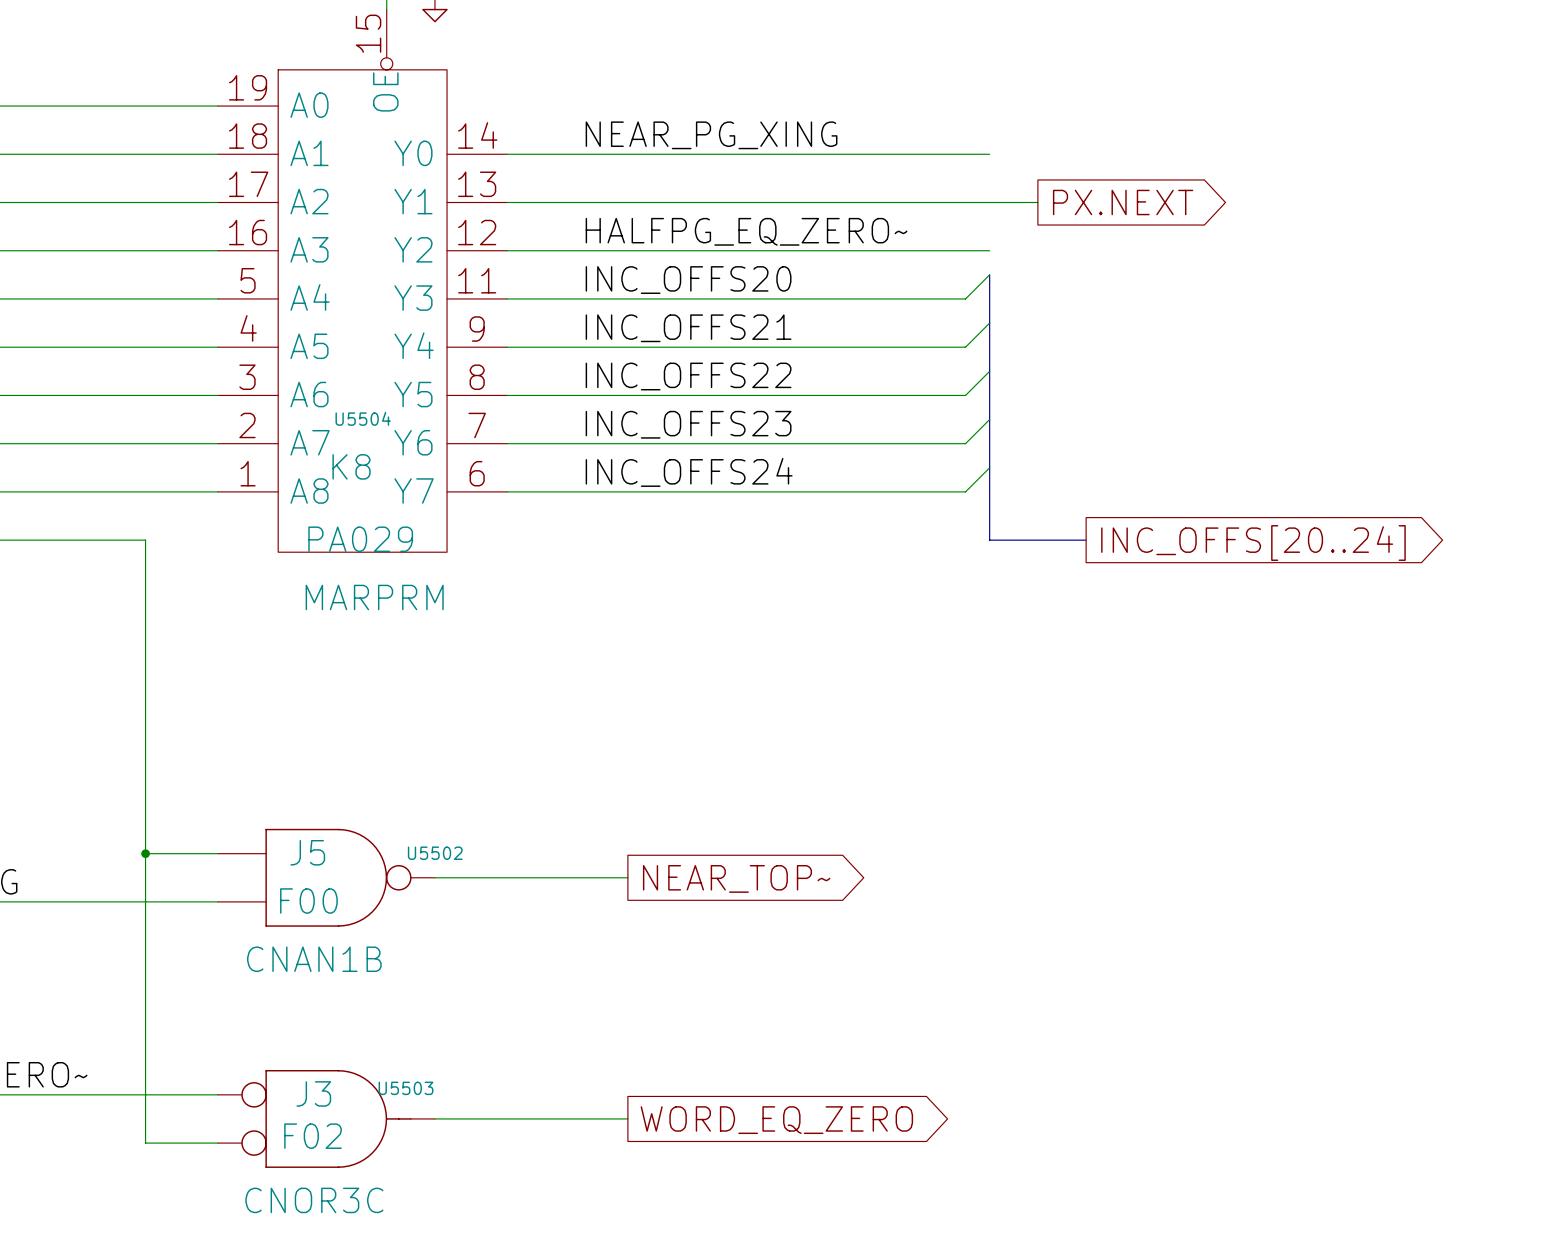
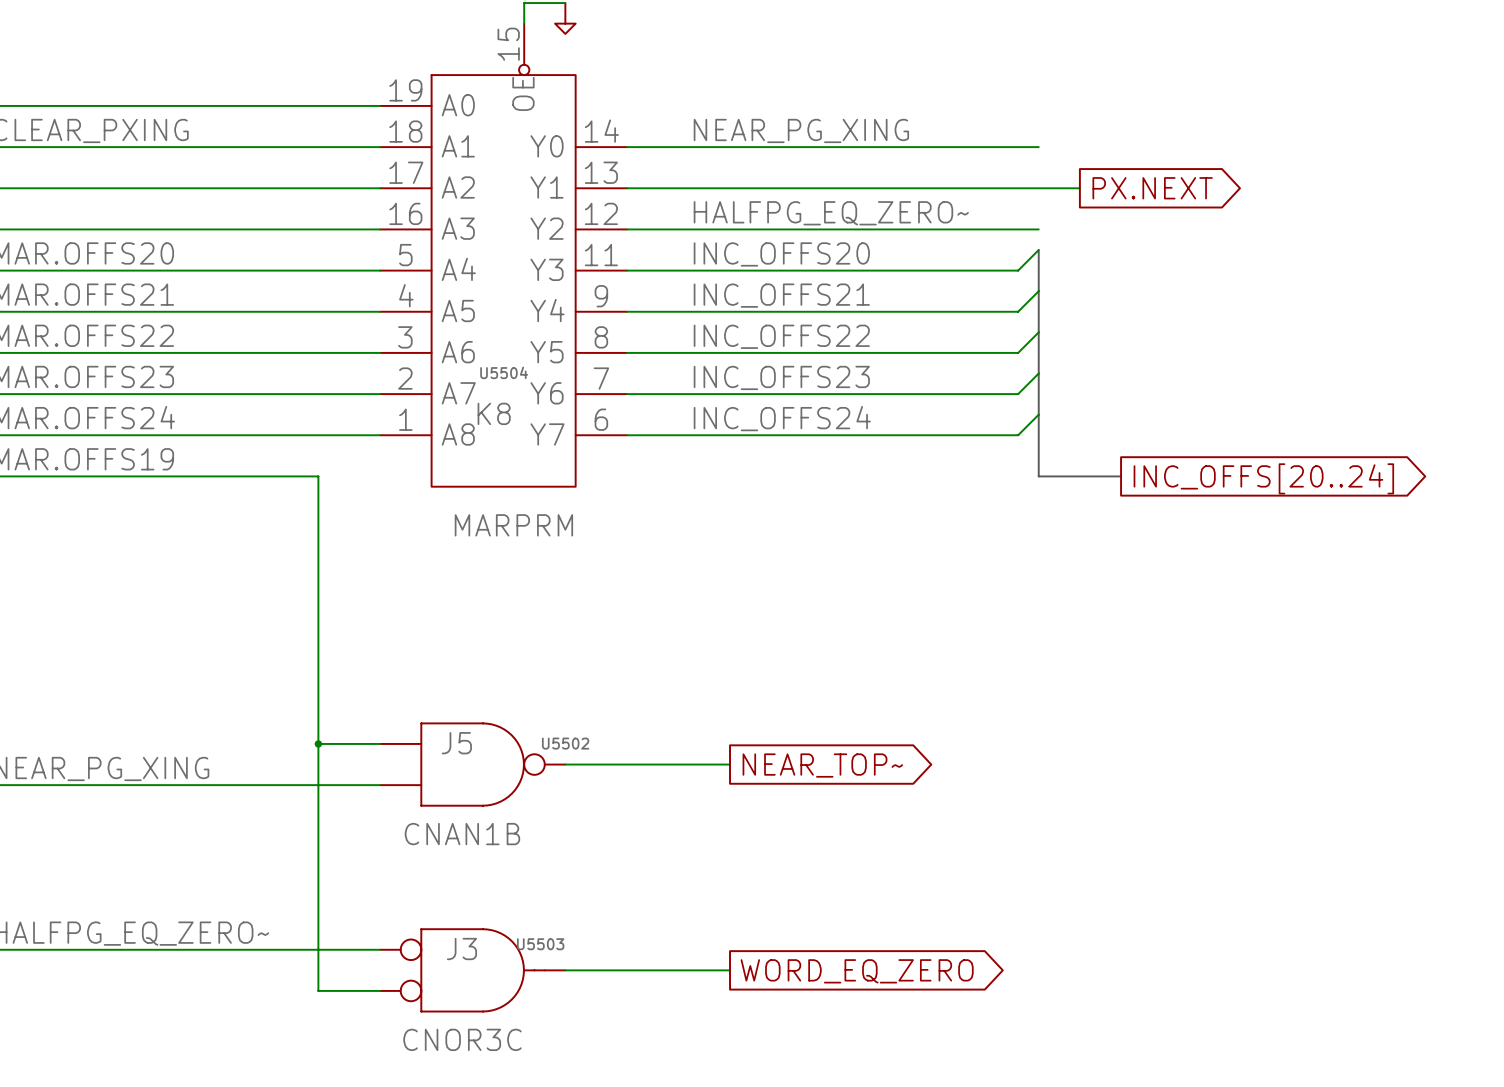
U5504 value: PA029 (360, 539) -> none
U5502 value: F00 (308, 901) -> none
U5503 value: F02 (313, 1136) -> none

